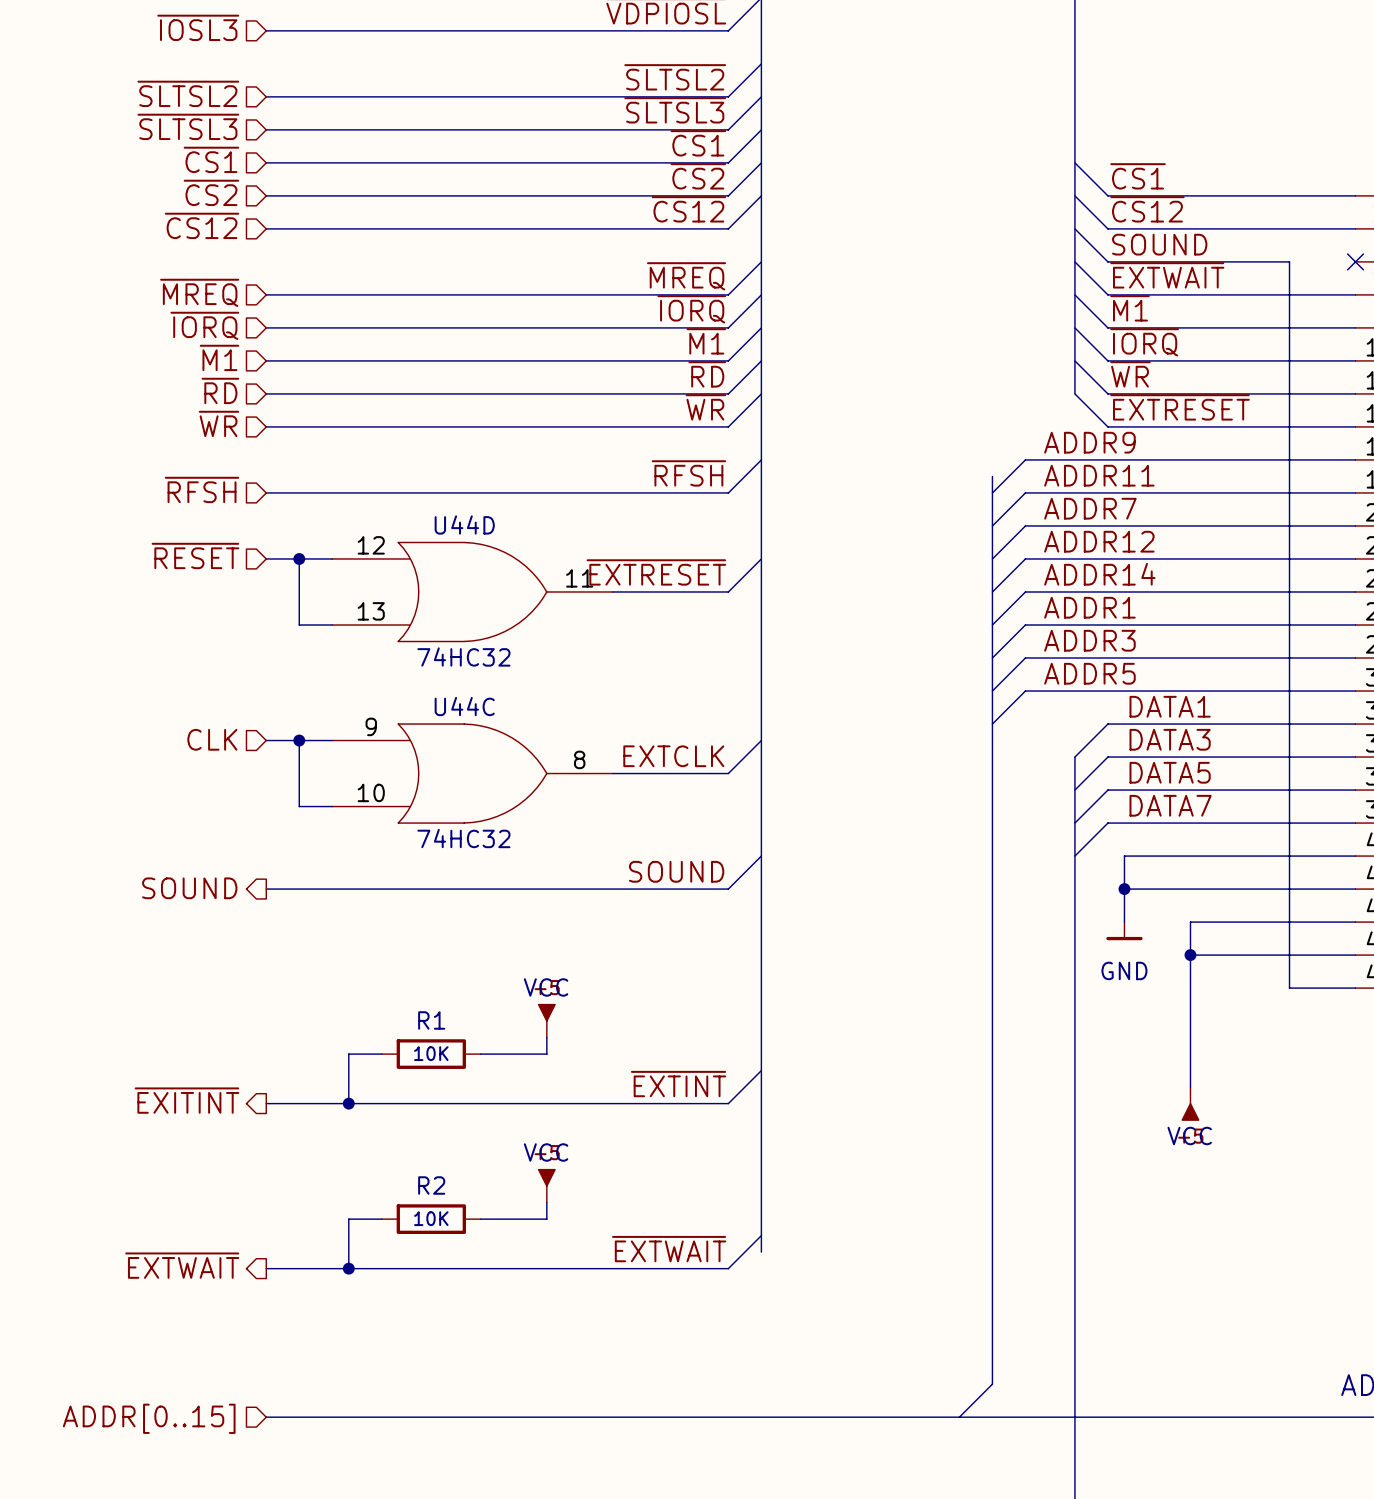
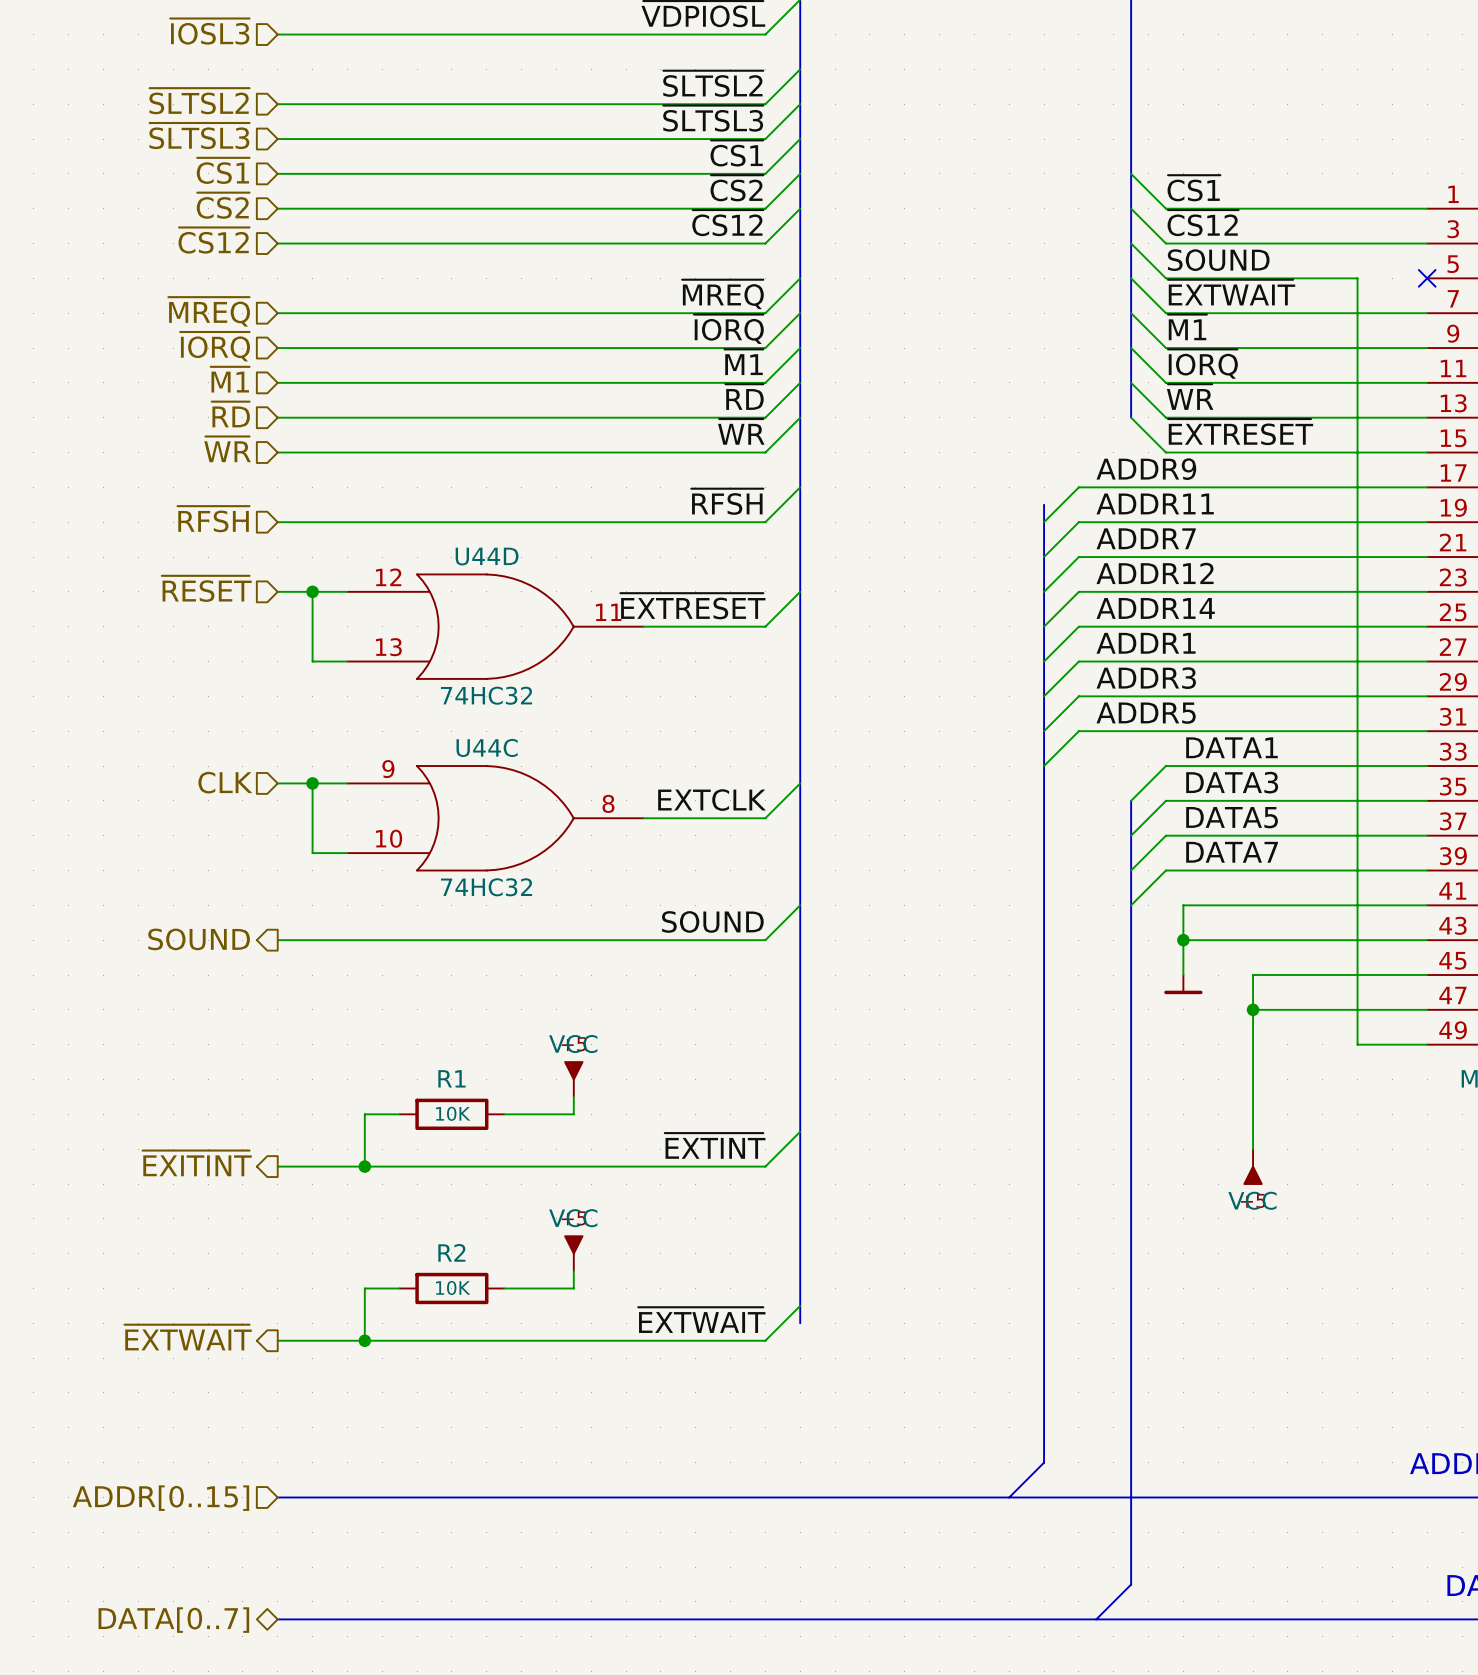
power symbol text: GND (1124, 970) -> none

